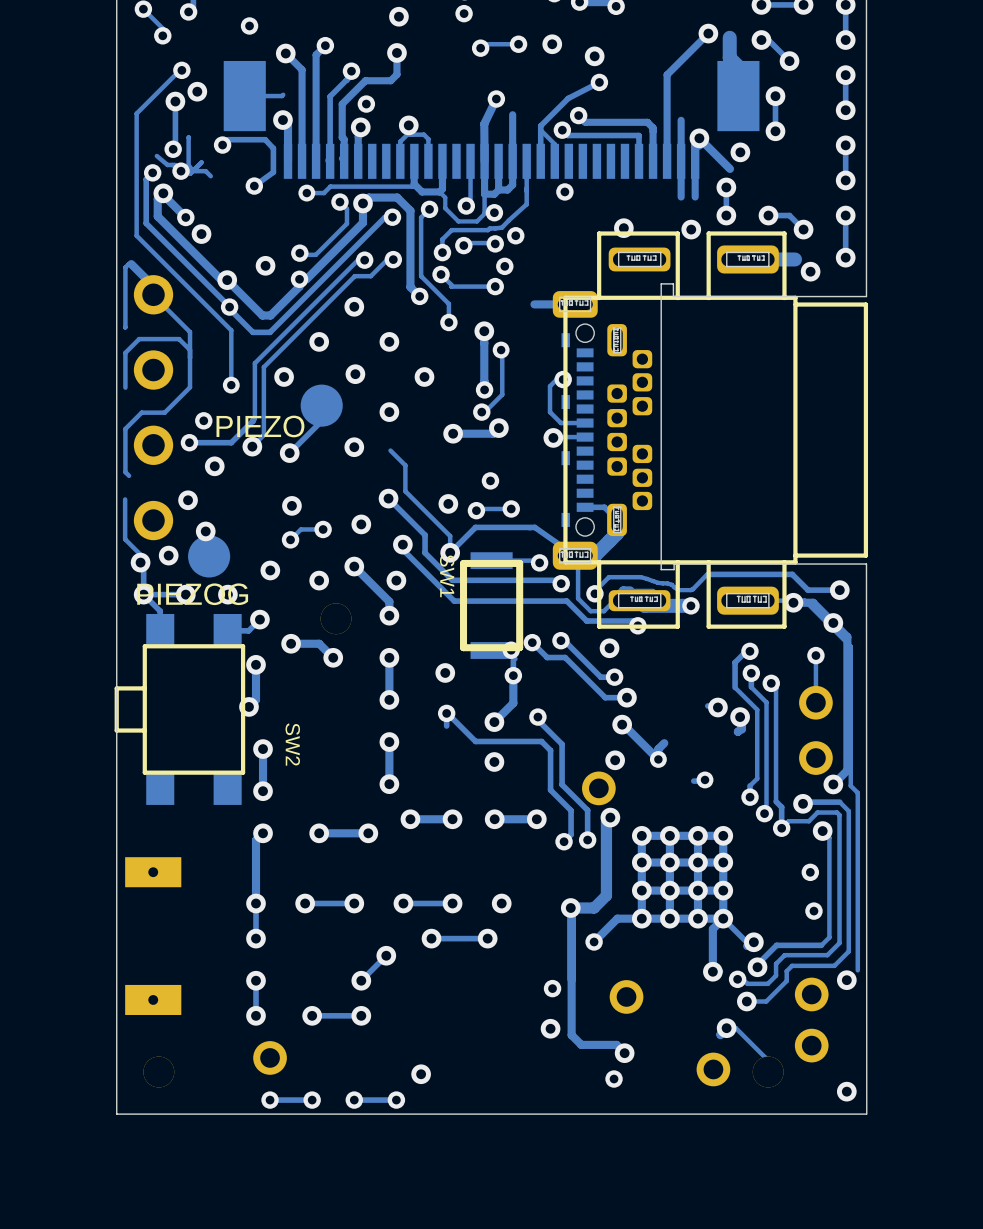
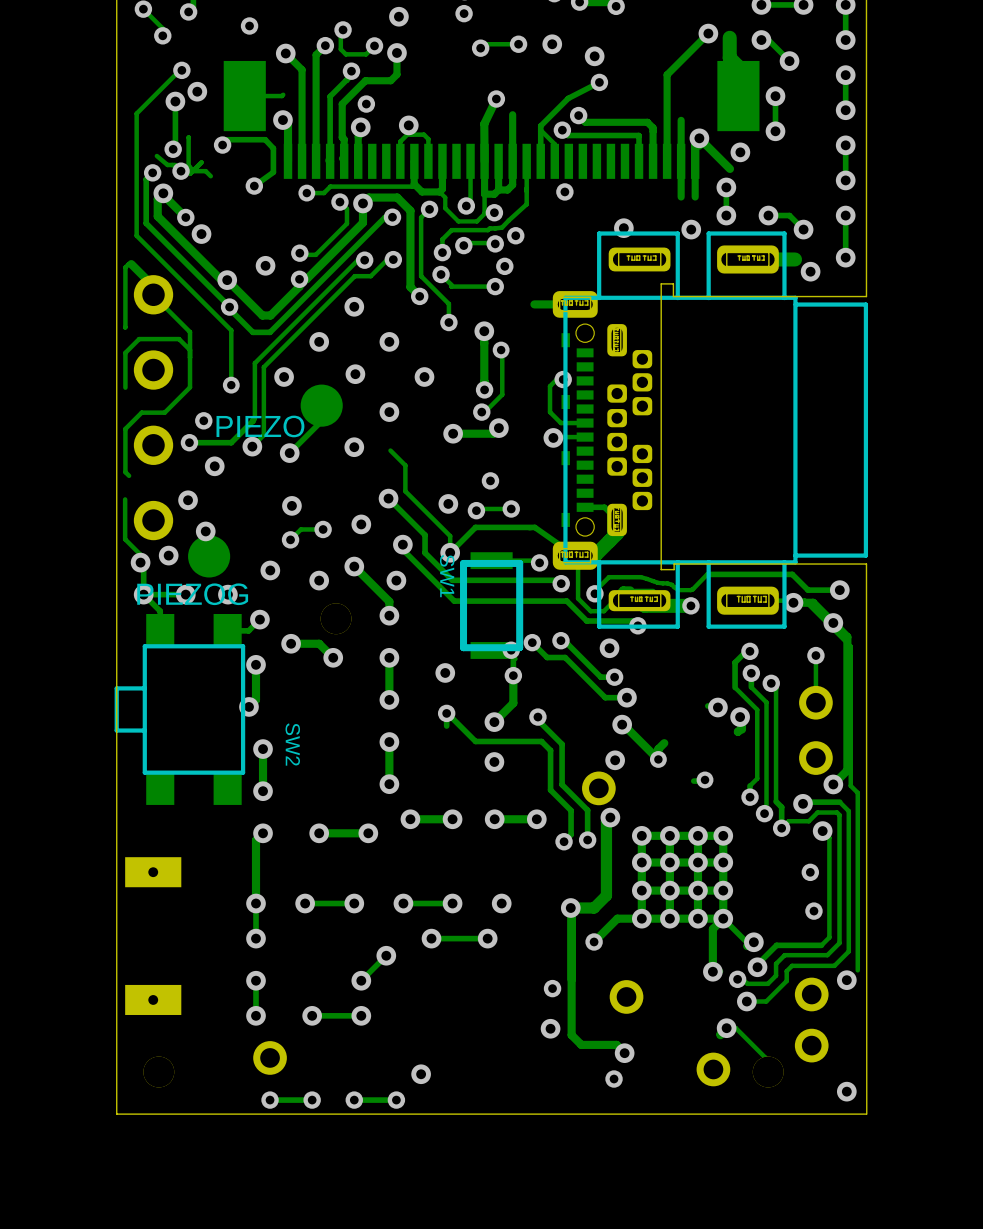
track: none -> (346, 26) (340, 32) (340, 49) (345, 54) (366, 54) (374, 45)
via: none -> (343, 29)
via: none -> (374, 45)

